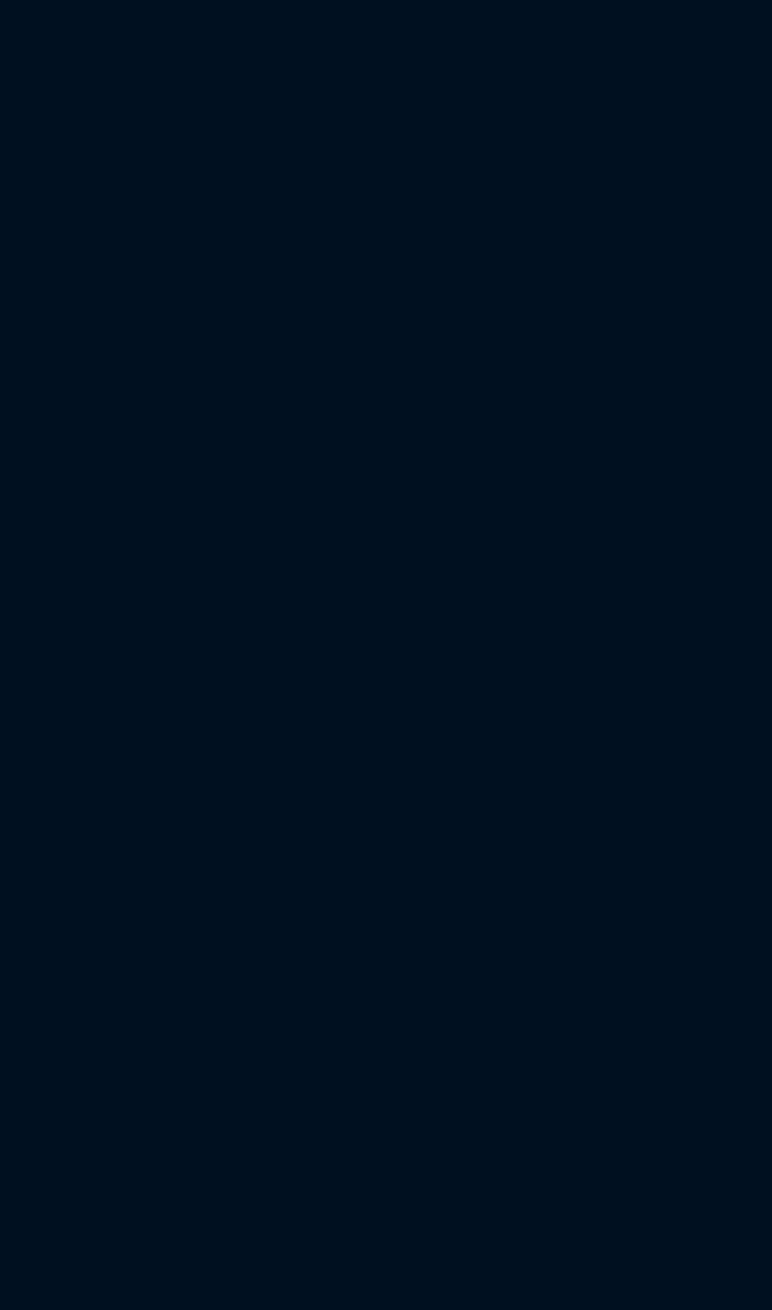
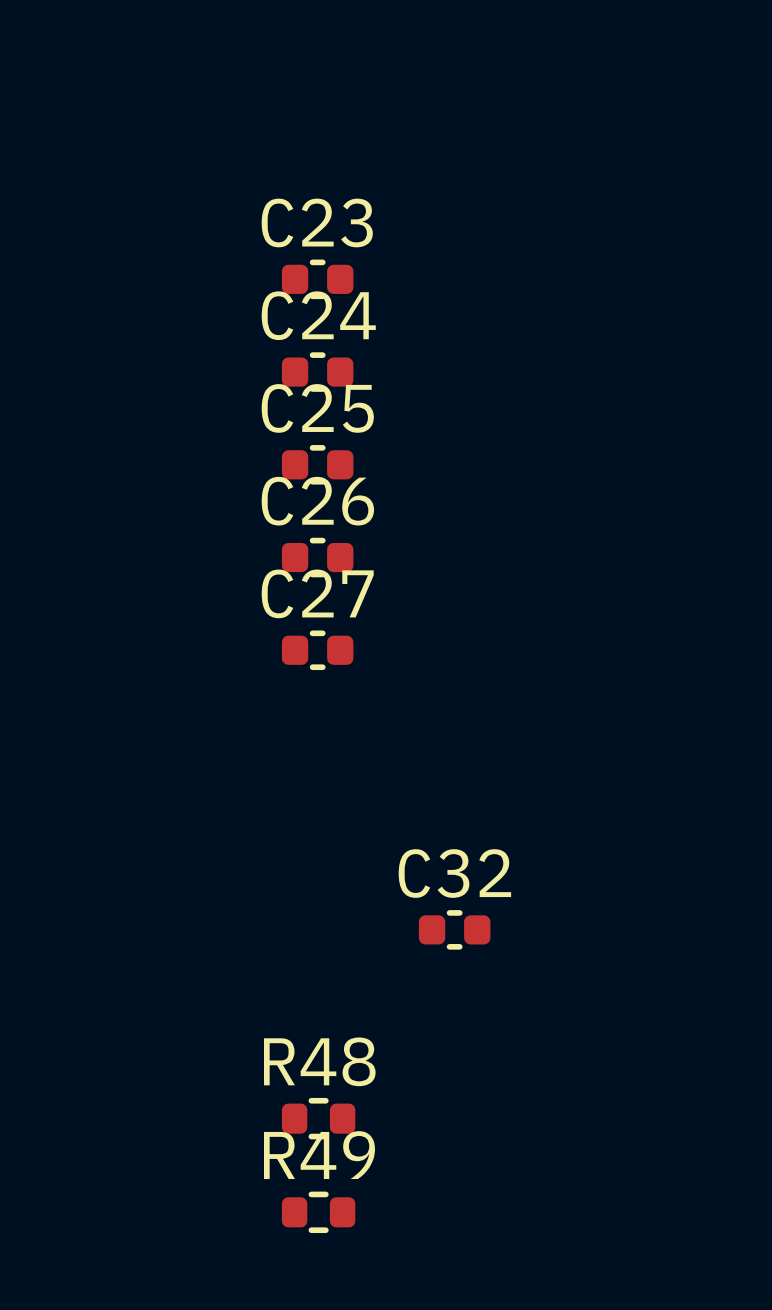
C23: none -> (317, 279)
C24: none -> (317, 372)
C25: none -> (317, 464)
C26: none -> (317, 557)
C27: none -> (317, 650)
C32: none -> (454, 929)
R48: none -> (318, 1118)
R49: none -> (318, 1212)

